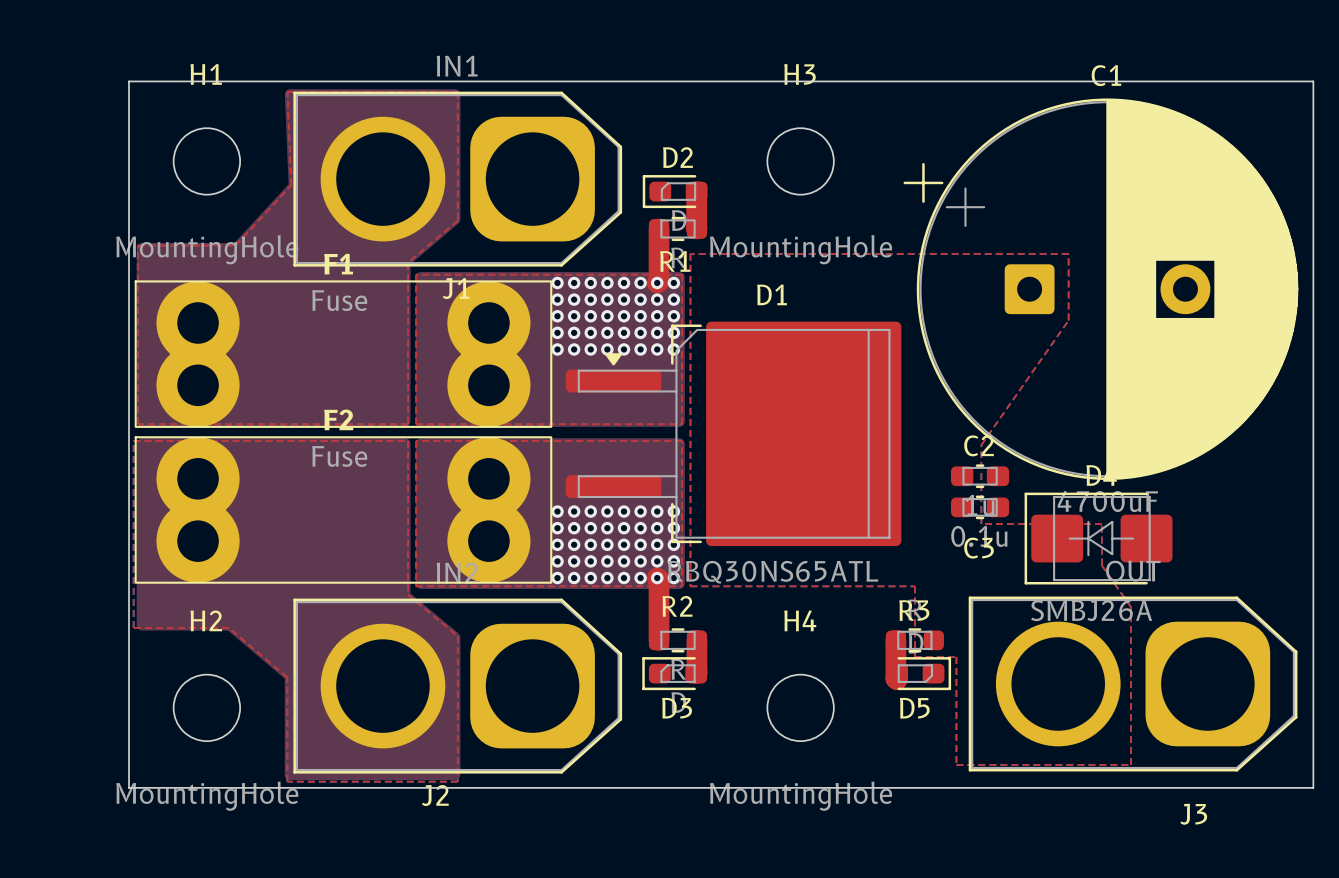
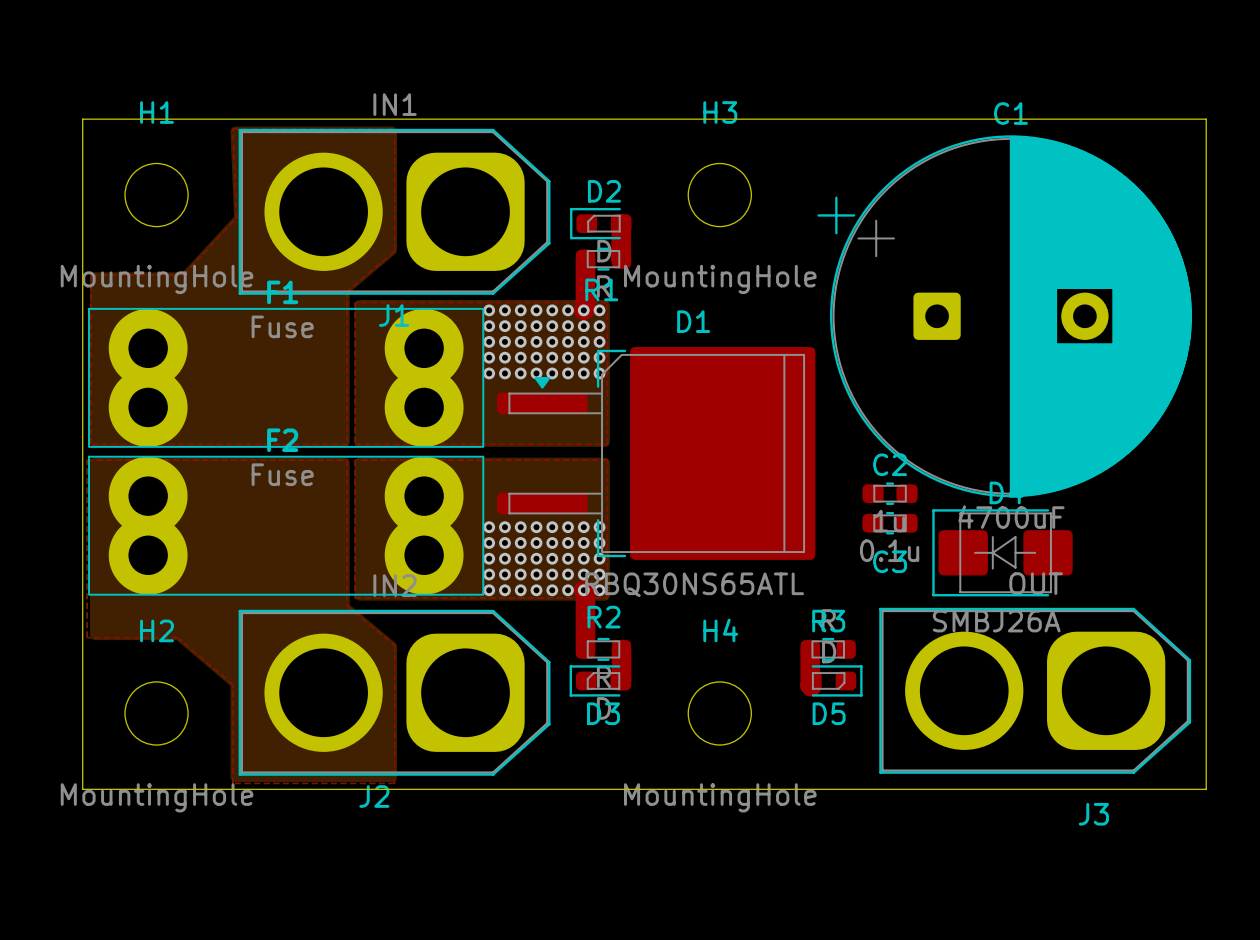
top zone outline: (690, 253) (690, 586) (914, 586) (914, 656) (956, 656) (956, 765) (1130, 765) (1130, 607) (1101, 565) (1101, 524) (981, 524) (981, 445) (1068, 320) (1068, 253) (690, 253) -> none

